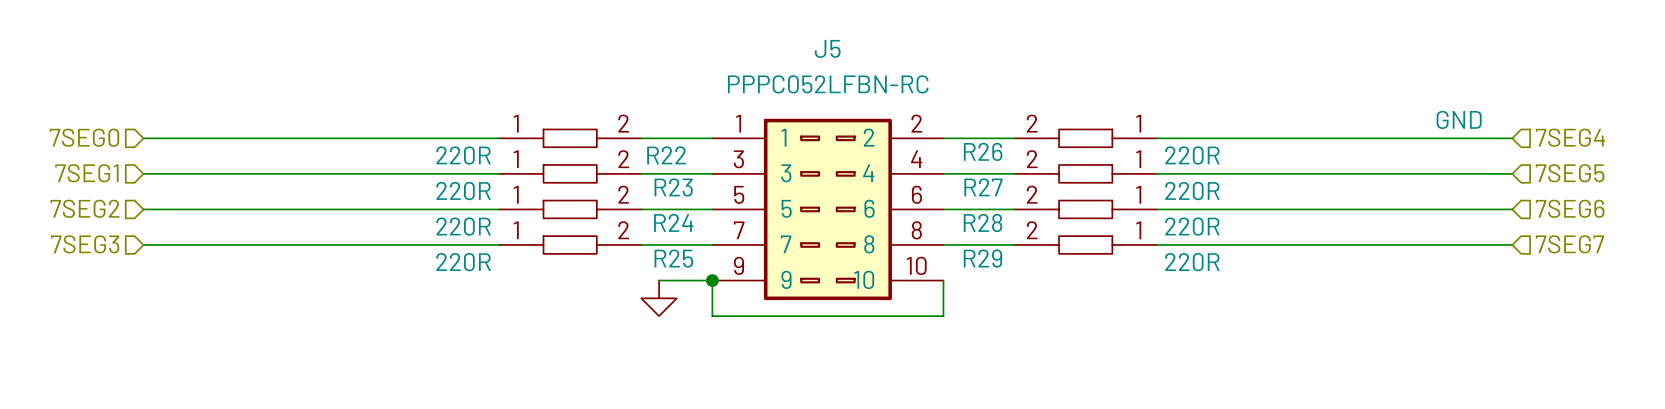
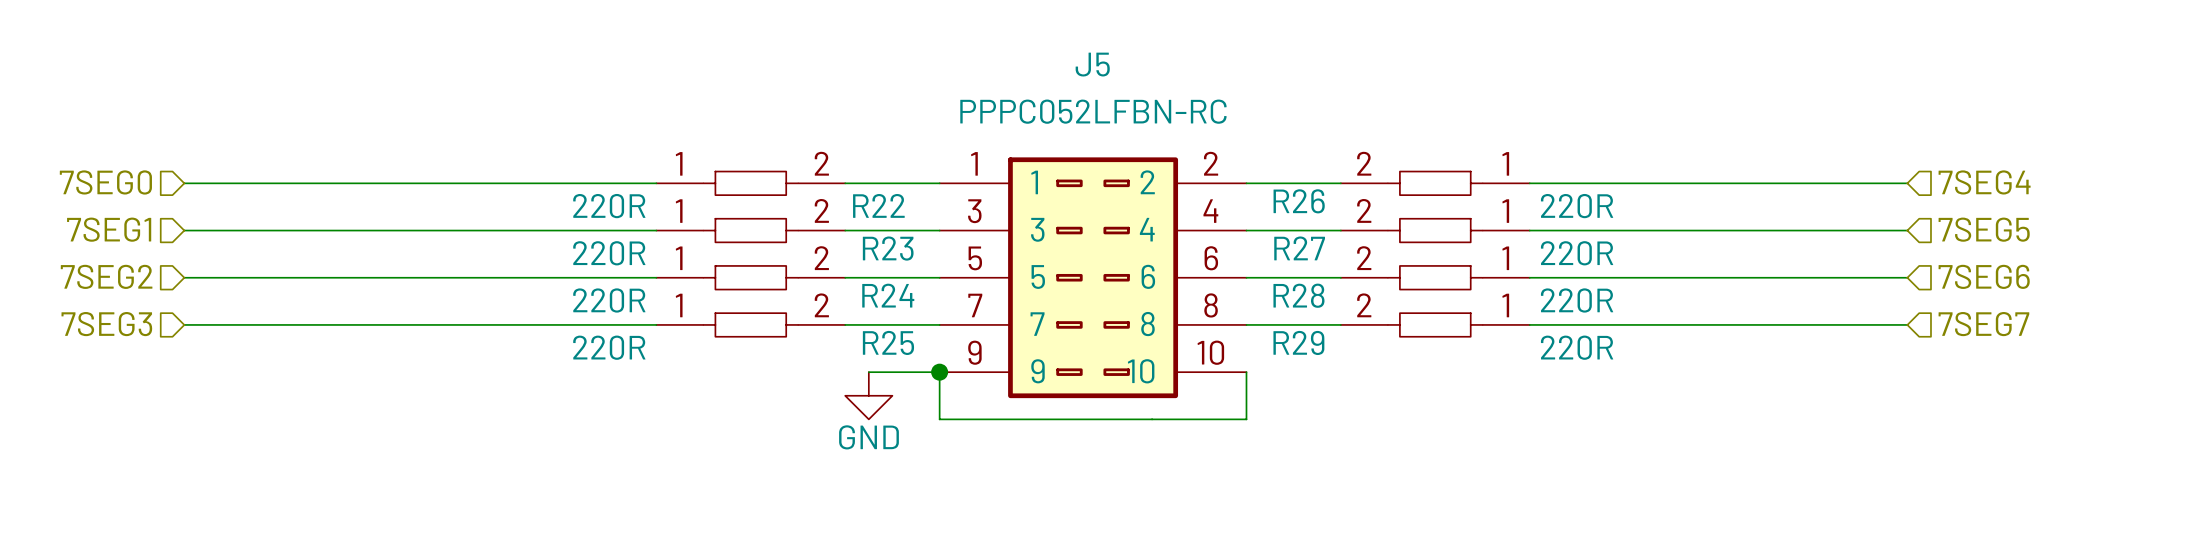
power symbol text position: GND (1459, 119) -> GND (869, 437)
hierarchical label position: 7SEG4 (1570, 137) -> 7SEG4 (1984, 182)
wire: (1441, 138) (1512, 138) -> none
wire: (1441, 173) (1512, 173) -> none
hierarchical label position: 7SEG5 (1570, 173) -> 7SEG5 (1984, 229)
hierarchical label position: 7SEG6 (1570, 208) -> 7SEG6 (1984, 276)
wire: (1441, 209) (1512, 209) -> none
hierarchical label position: 7SEG7 (1569, 244) -> 7SEG7 (1983, 324)
wire: (1441, 245) (1512, 245) -> none

